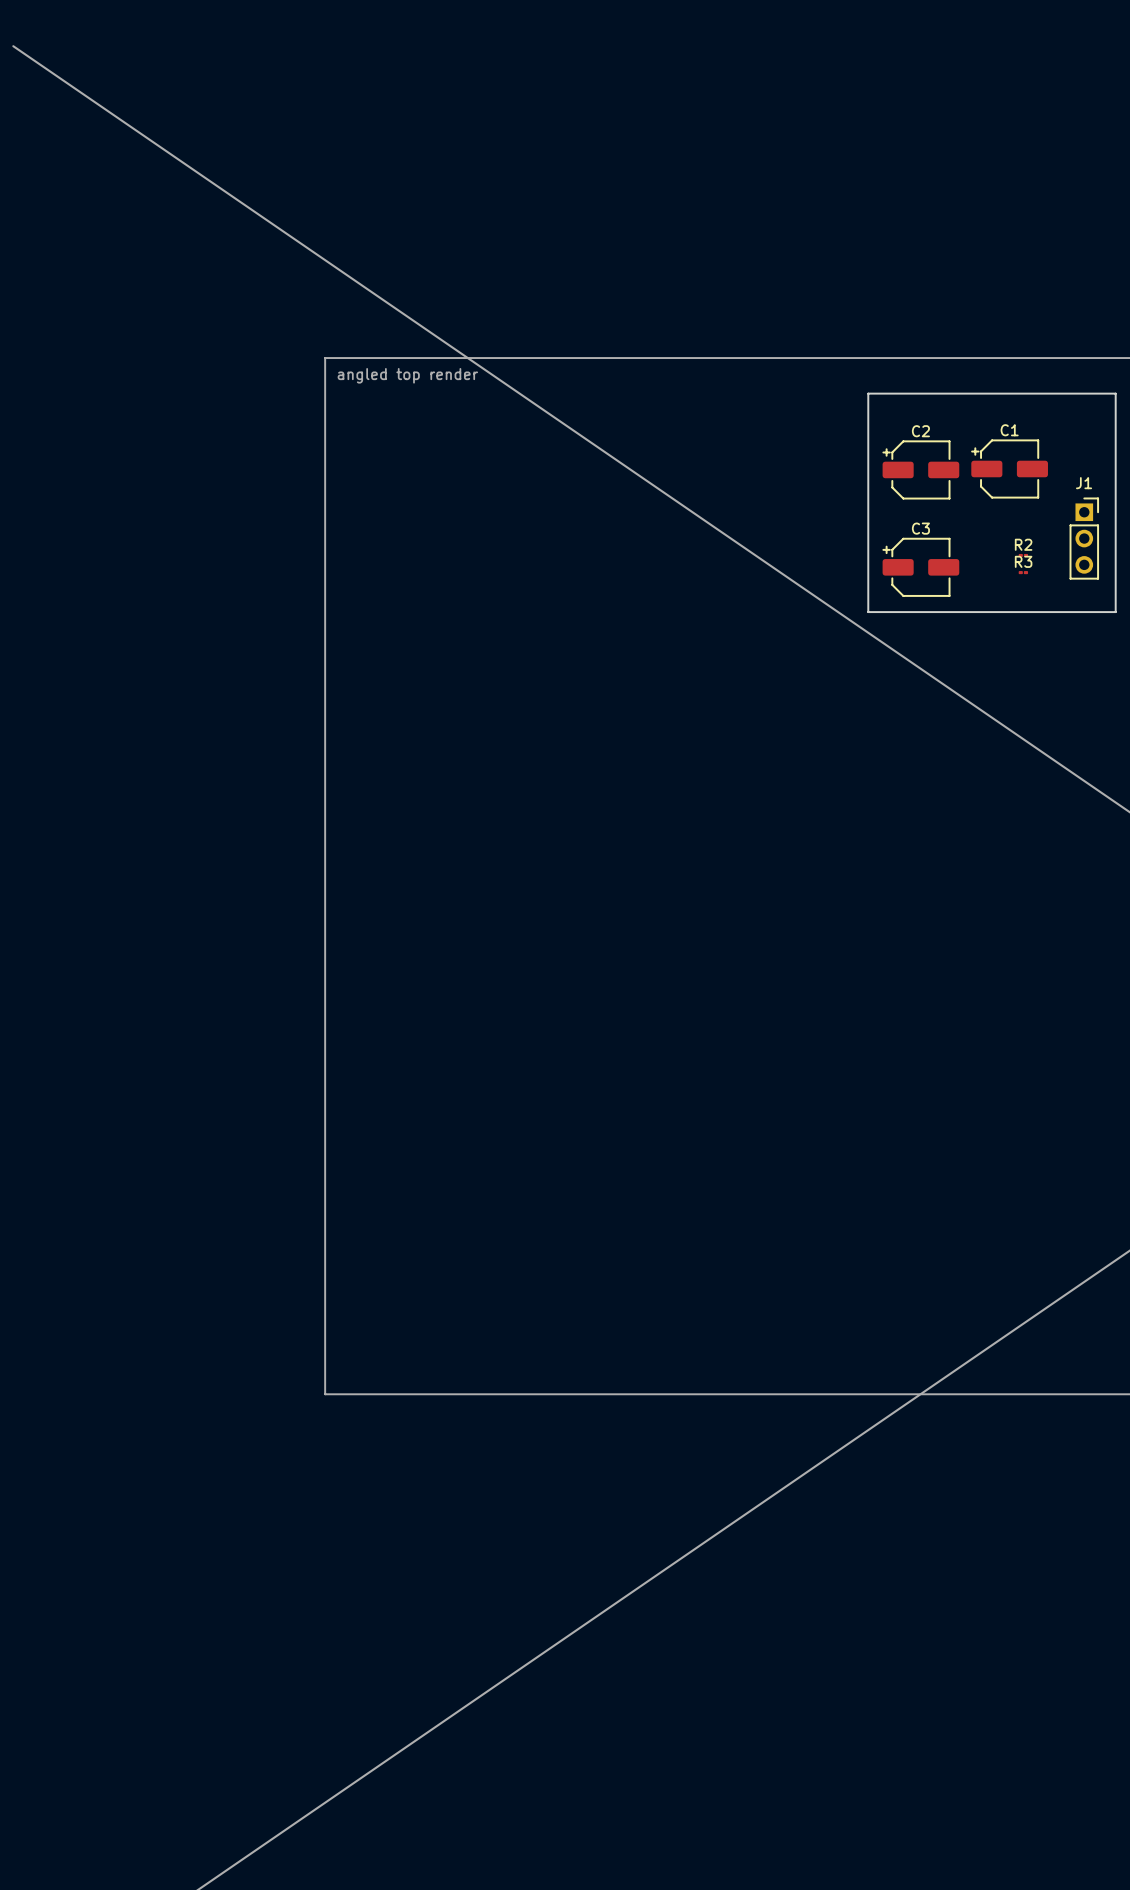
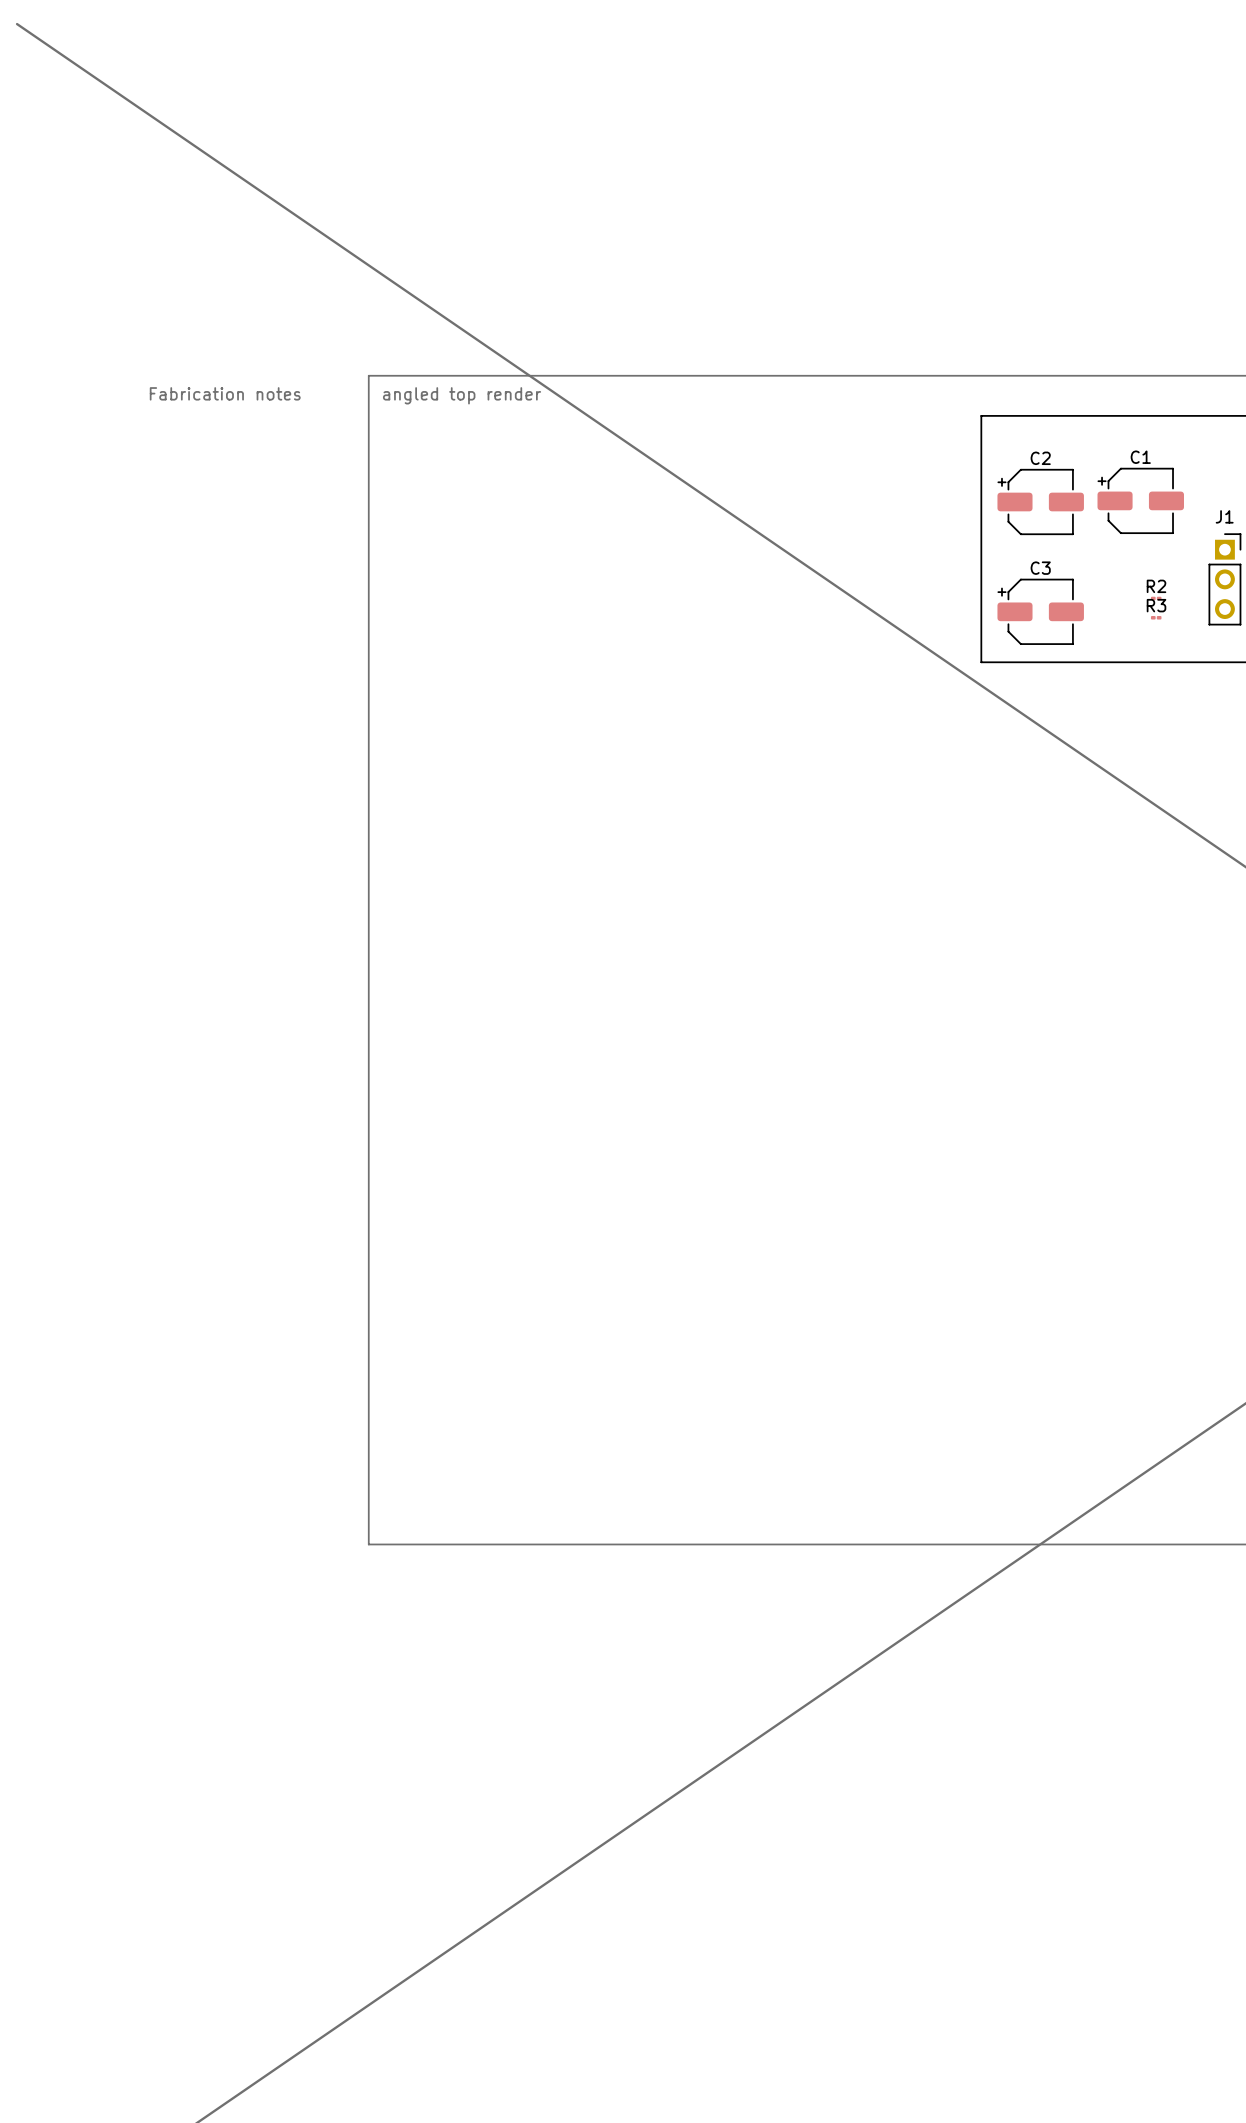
text: none -> Fabrication notes (225, 393)

